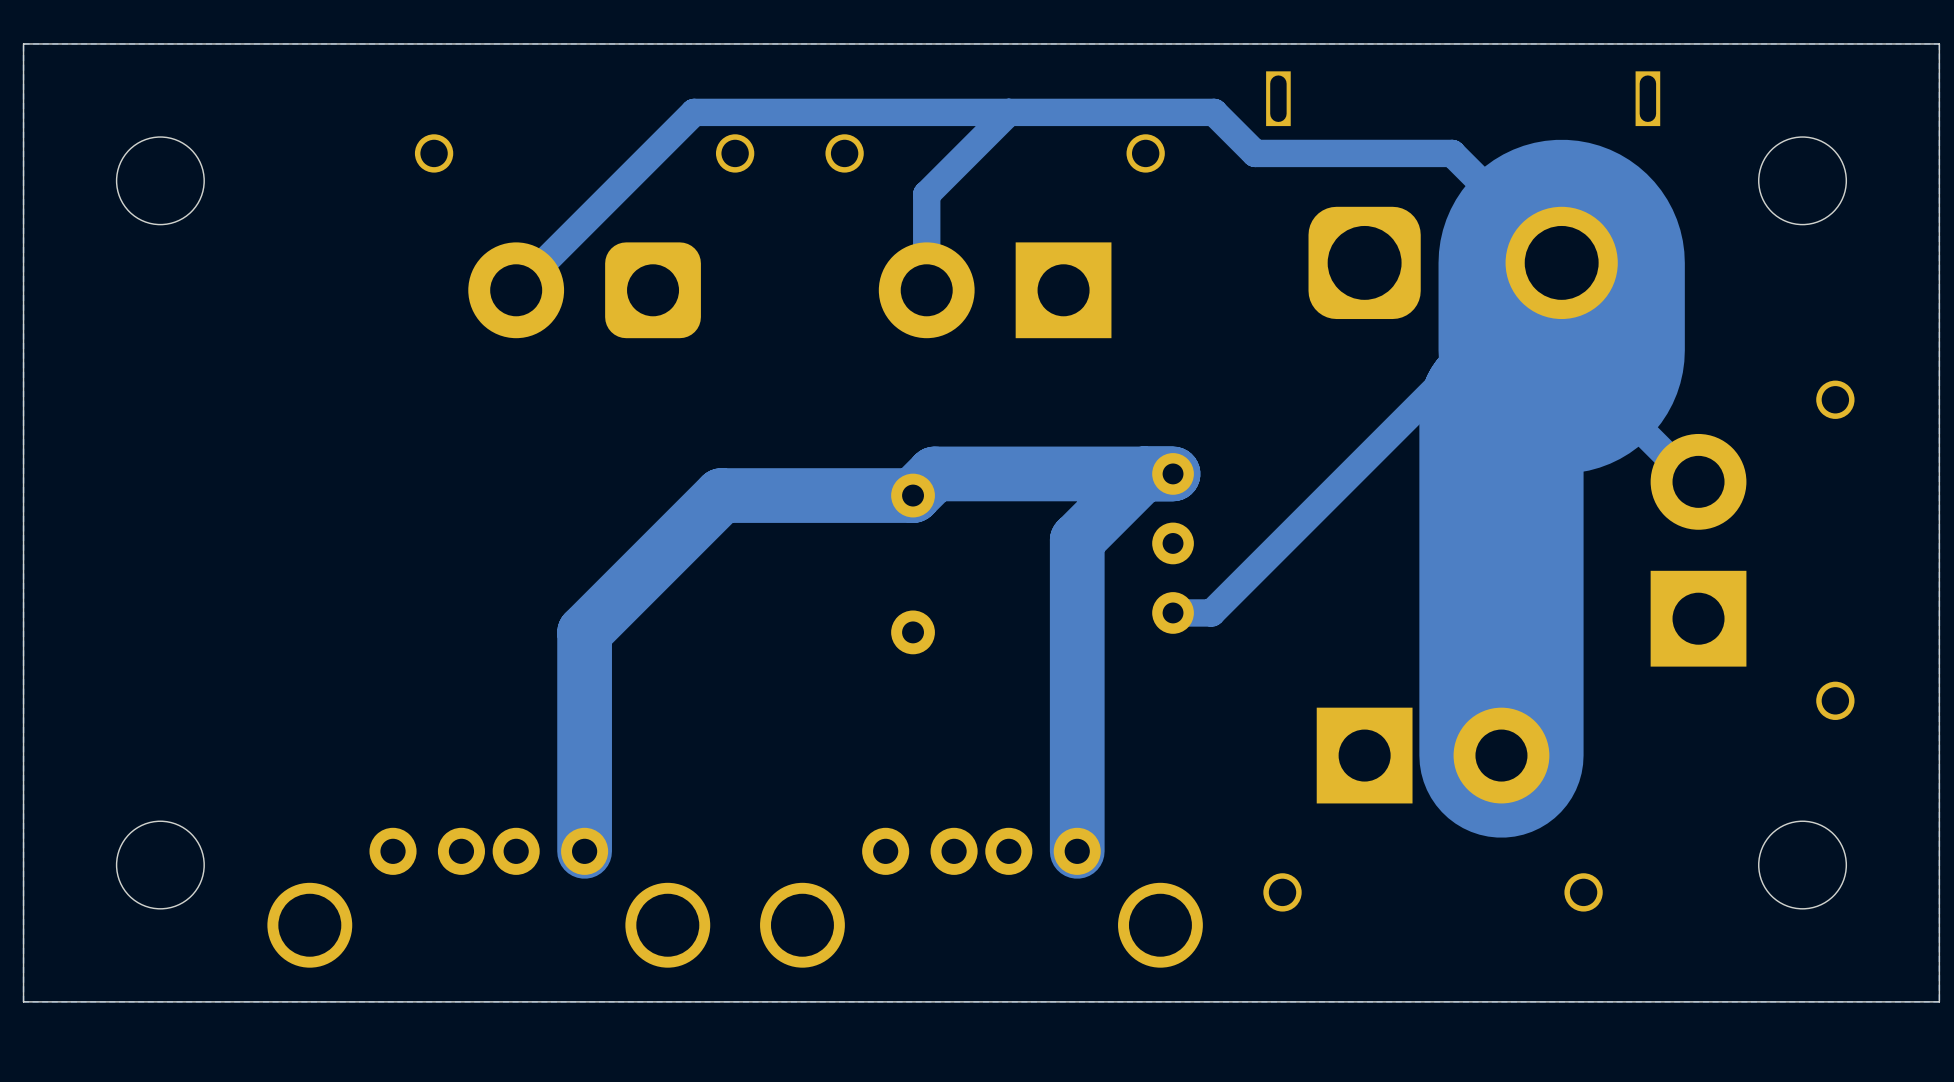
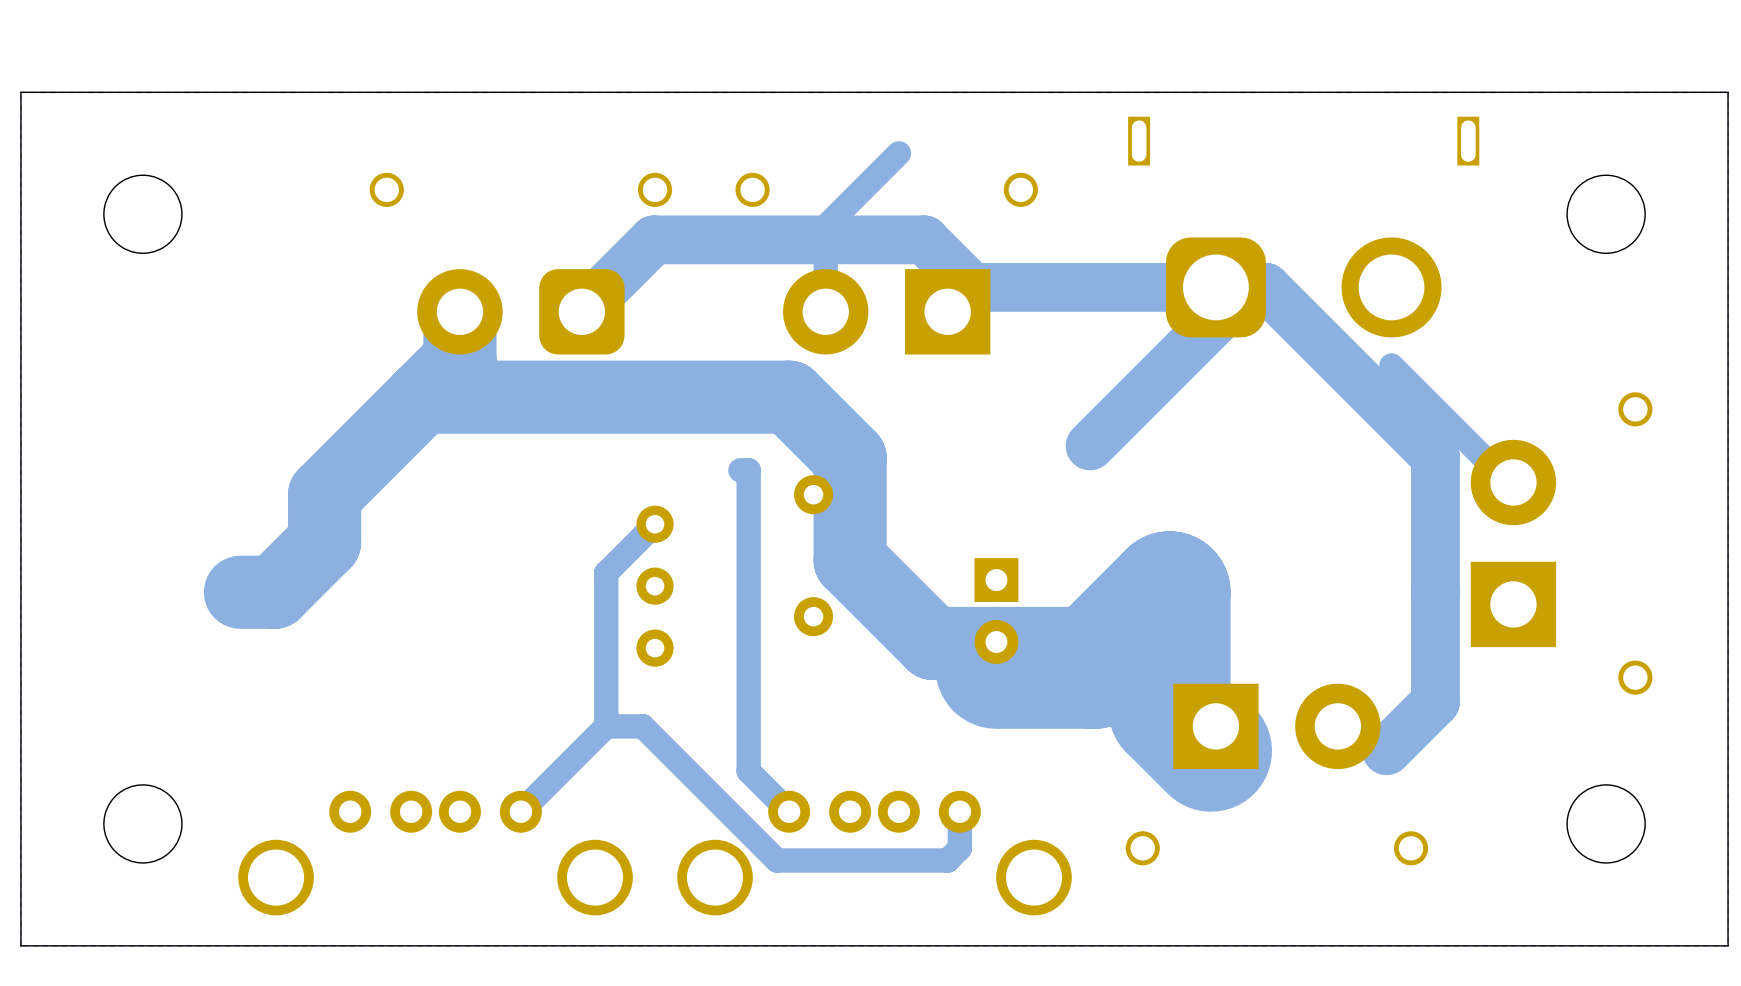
track: none -> (972, 287) (1265, 287) (1435, 456) (1435, 702) (1386, 750)
track: none -> (972, 287) (924, 239) (653, 239) (581, 311)
track: none -> (1215, 287) (1215, 320) (1090, 445)
track: (1561, 262) (1452, 153) (1255, 153) (1214, 112) (694, 112) (516, 290) -> (240, 592) (274, 592) (324, 542) (324, 495) (459, 359) (459, 311)
track: (1561, 262) (1211, 612) (1173, 612) -> none
track: (1561, 262) (1561, 350) (1501, 410) (1501, 755) -> none
track: none -> (422, 397) (789, 397) (850, 458) (850, 560) (933, 643) (996, 643)
track: none -> (740, 470) (748, 470) (748, 771) (789, 811)
track: (1143, 473) (1077, 540) (1077, 851) -> (606, 726) (642, 726) (776, 860) (947, 860) (959, 848) (959, 811)
track: (1173, 473) (934, 473) (913, 495) (721, 495) (584, 632) (584, 851) -> (606, 726) (520, 811)
track: none -> (655, 524) (606, 572) (606, 726)
part position: (1173, 543) -> (655, 586)
part: none -> (996, 611)
track: none -> (996, 667) (1093, 667) (1169, 592) (1169, 709) (1211, 750)

